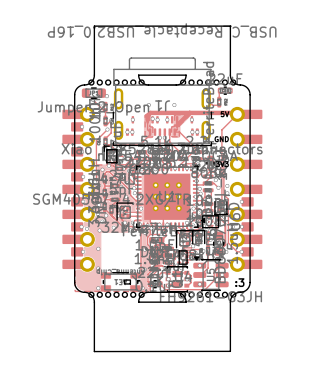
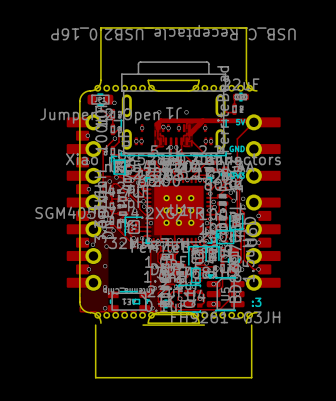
board edge: (240, 84) (247, 87) (250, 94) (250, 282) (247, 289) (240, 292) -> none
board edge: none -> (153, 314) (193, 314)
board edge: (94, 302) (94, 351) (230, 351) (230, 302) -> none
board edge: none -> (95, 325) (95, 377) (251, 377) (251, 325)
board edge: none -> (143, 325) (204, 325)

